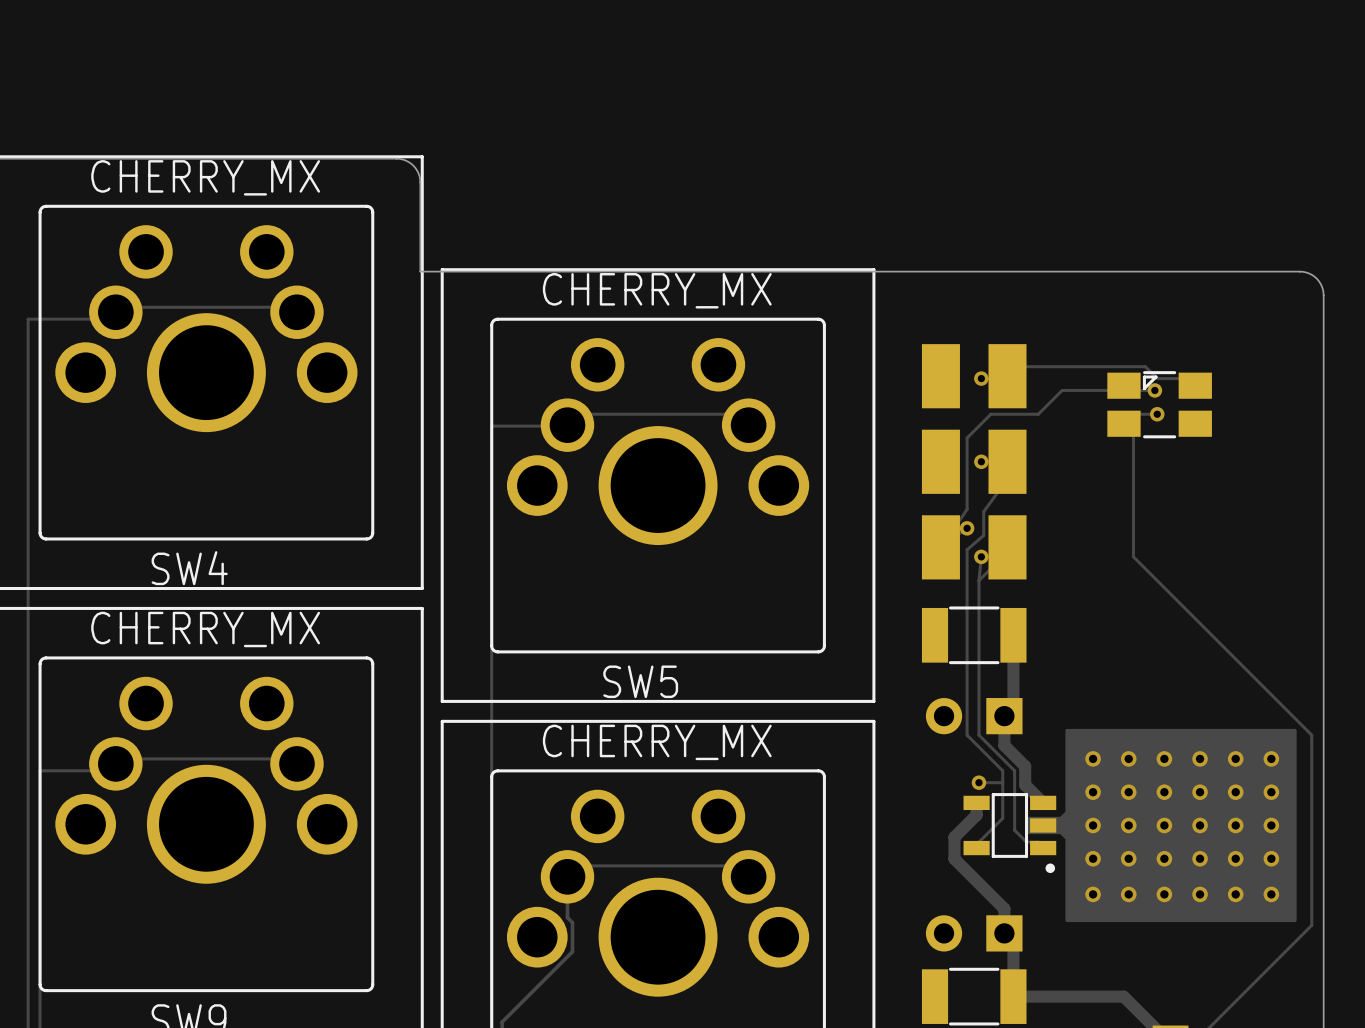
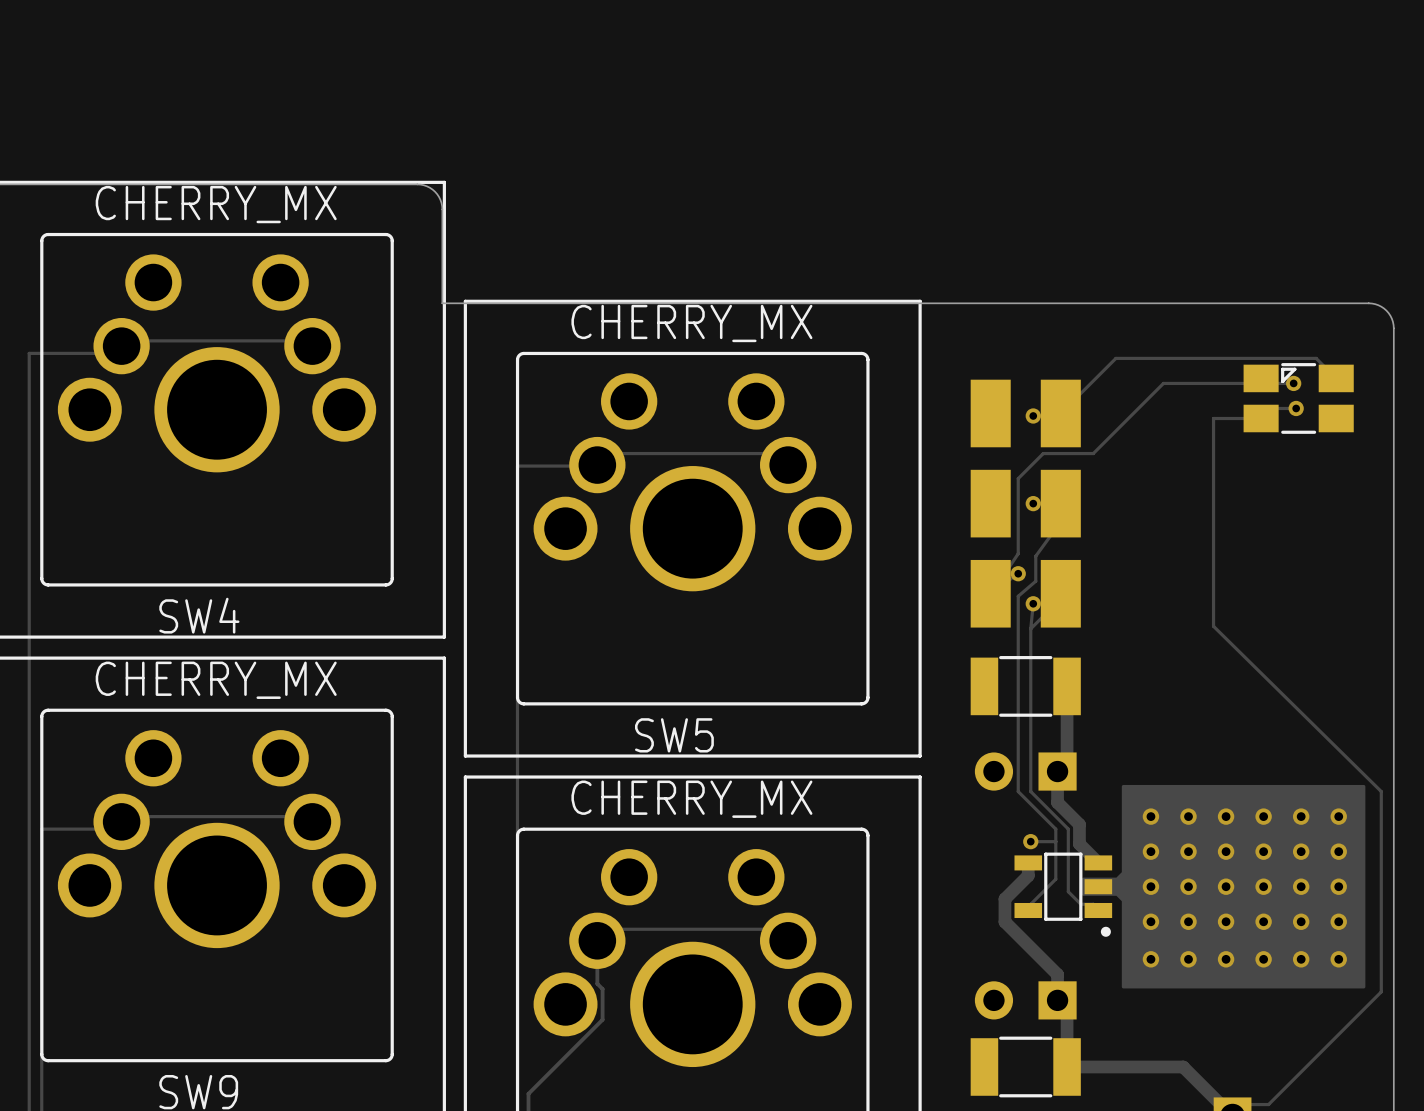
via: none -> (1293, 383)
via: none -> (1296, 408)
track: (1007, 376) (1014, 366) (1145, 366) (1157, 378) (1192, 378) (1195, 385) -> (1060, 413) (1115, 358) (1316, 358) (1336, 378)
track: (1062, 390) (1121, 390) (1123, 385) (1133, 390) (1154, 390) -> (1118, 428) (1163, 383) (1258, 383) (1261, 378) (1271, 383) (1293, 383)
via: (1154, 390) -> none
part position: (1159, 404) -> (1298, 398)
track: (1157, 414) (1133, 414) (1123, 423) (1133, 426) (1133, 556) (1311, 735) -> (1296, 408) (1271, 408) (1261, 418) (1213, 418) (1213, 626) (1381, 791)
via: (1157, 414) -> none

